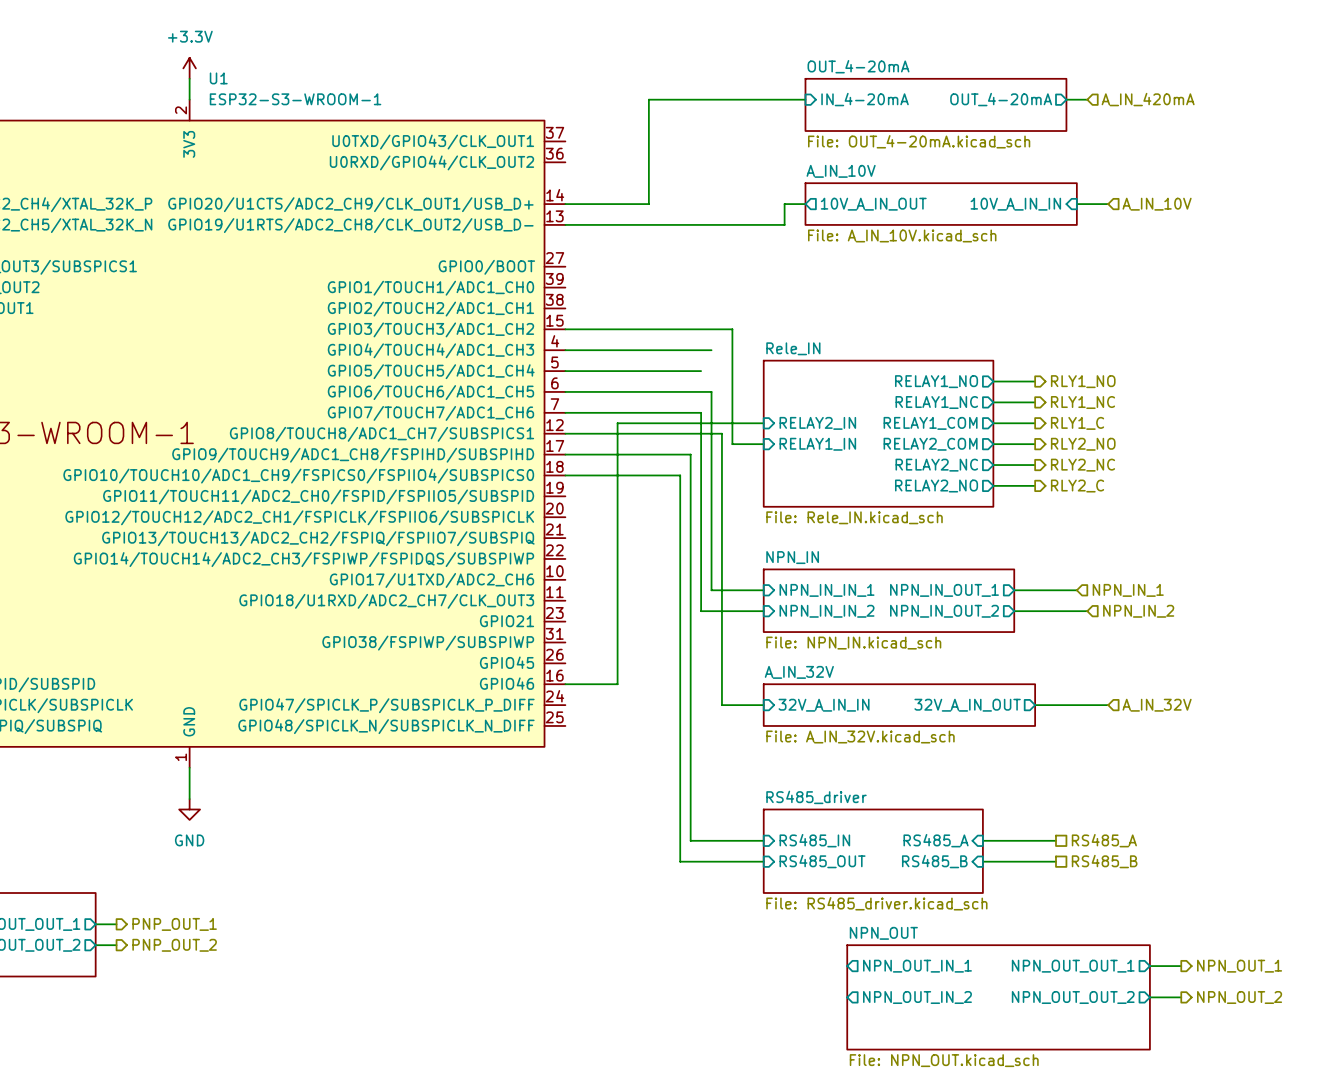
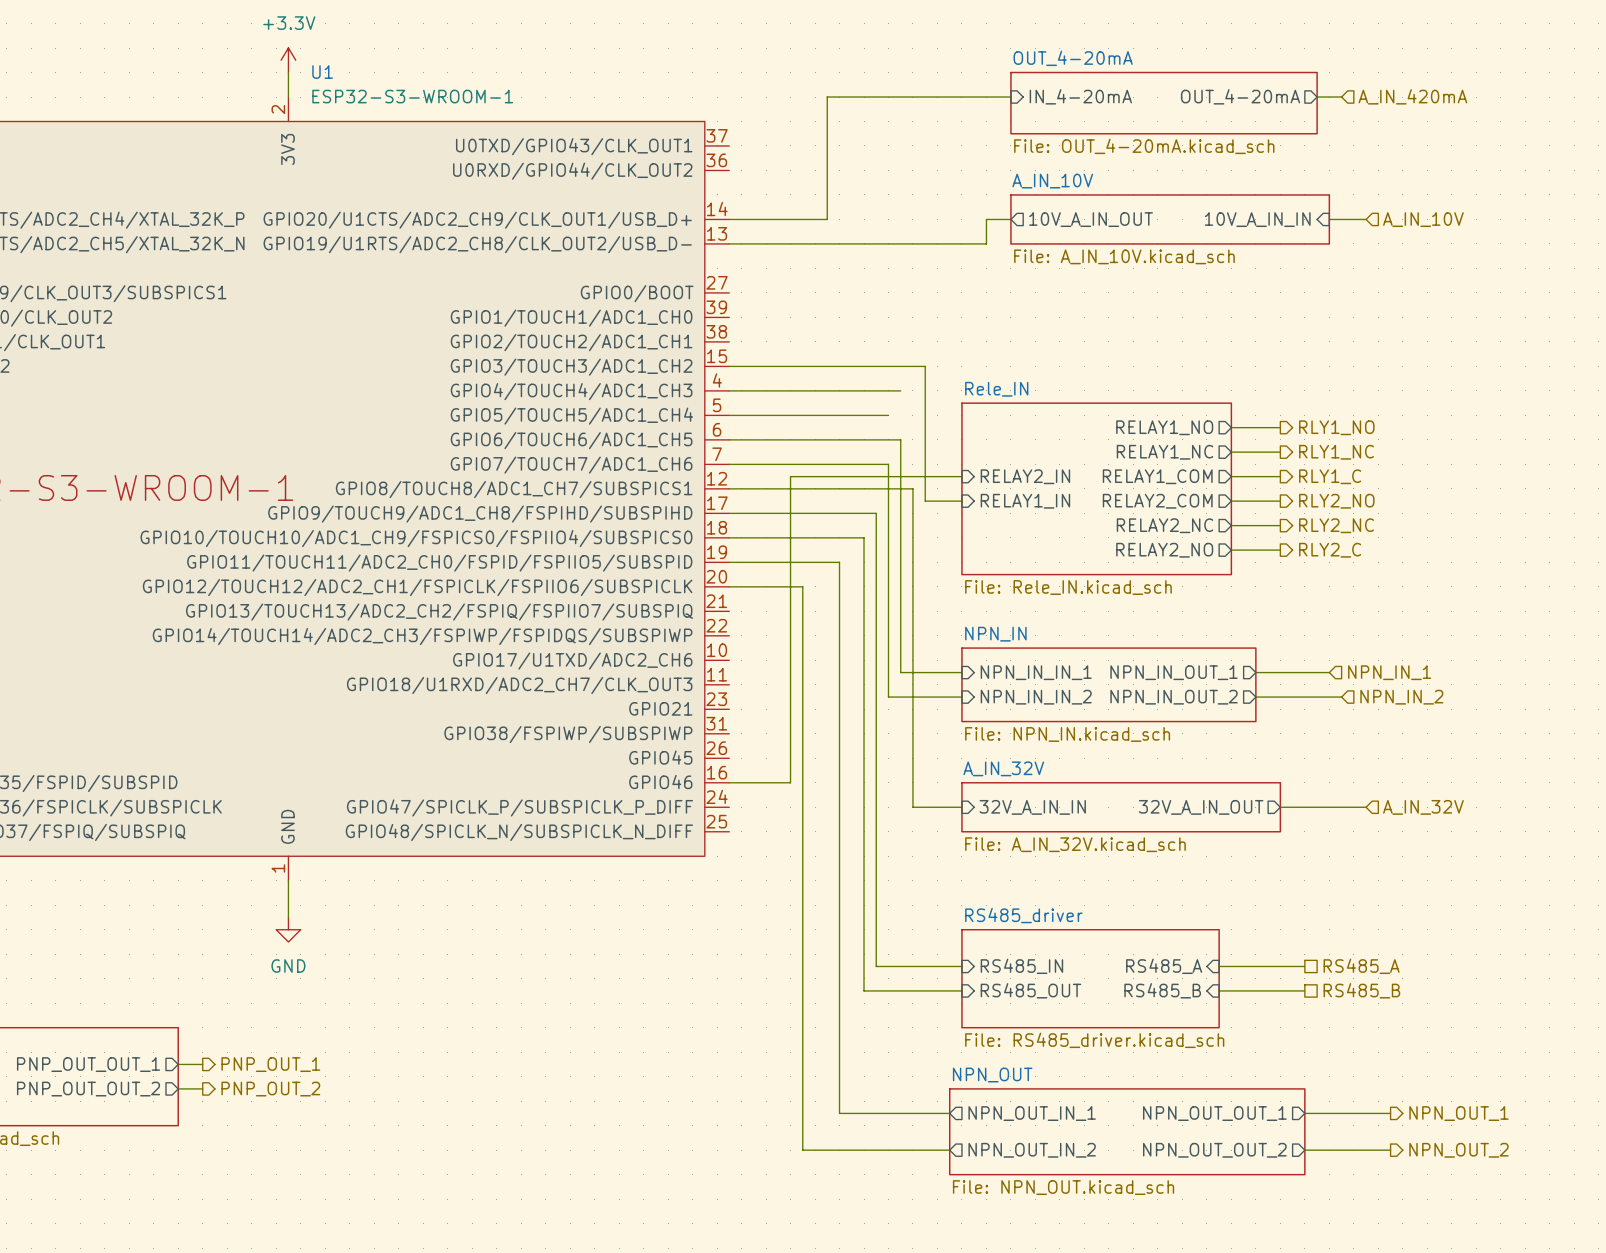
wire: none -> (729, 562) (839, 562) (839, 1113) (949, 1113)
wire: none -> (729, 586) (802, 586) (802, 1150) (949, 1150)
sheet pin position: NPN_OUT_IN_1 (917, 966) -> NPN_OUT_IN_1 (1032, 1113)
wire: none -> (1304, 1113) (1390, 1113)
sheet pin position: NPN_OUT_OUT_1 (1073, 966) -> NPN_OUT_OUT_1 (1214, 1113)
wire: (1149, 966) (1181, 966) -> none
hierarchical label position: NPN_OUT_1 (1239, 966) -> NPN_OUT_1 (1459, 1113)
sheet NPN_OUT: none -> File: NPN_OUT.kicad_sch (1127, 1131)
sheet pin position: NPN_OUT_IN_2 (917, 997) -> NPN_OUT_IN_2 (1032, 1150)
sheet NPN_OUT: File: NPN_OUT.kicad_sch (998, 997) -> none
wire: none -> (1304, 1150) (1390, 1150)
sheet pin position: NPN_OUT_OUT_2 (1073, 997) -> NPN_OUT_OUT_2 (1214, 1150)
wire: (1149, 997) (1181, 997) -> none
hierarchical label position: NPN_OUT_2 (1239, 997) -> NPN_OUT_2 (1459, 1150)

